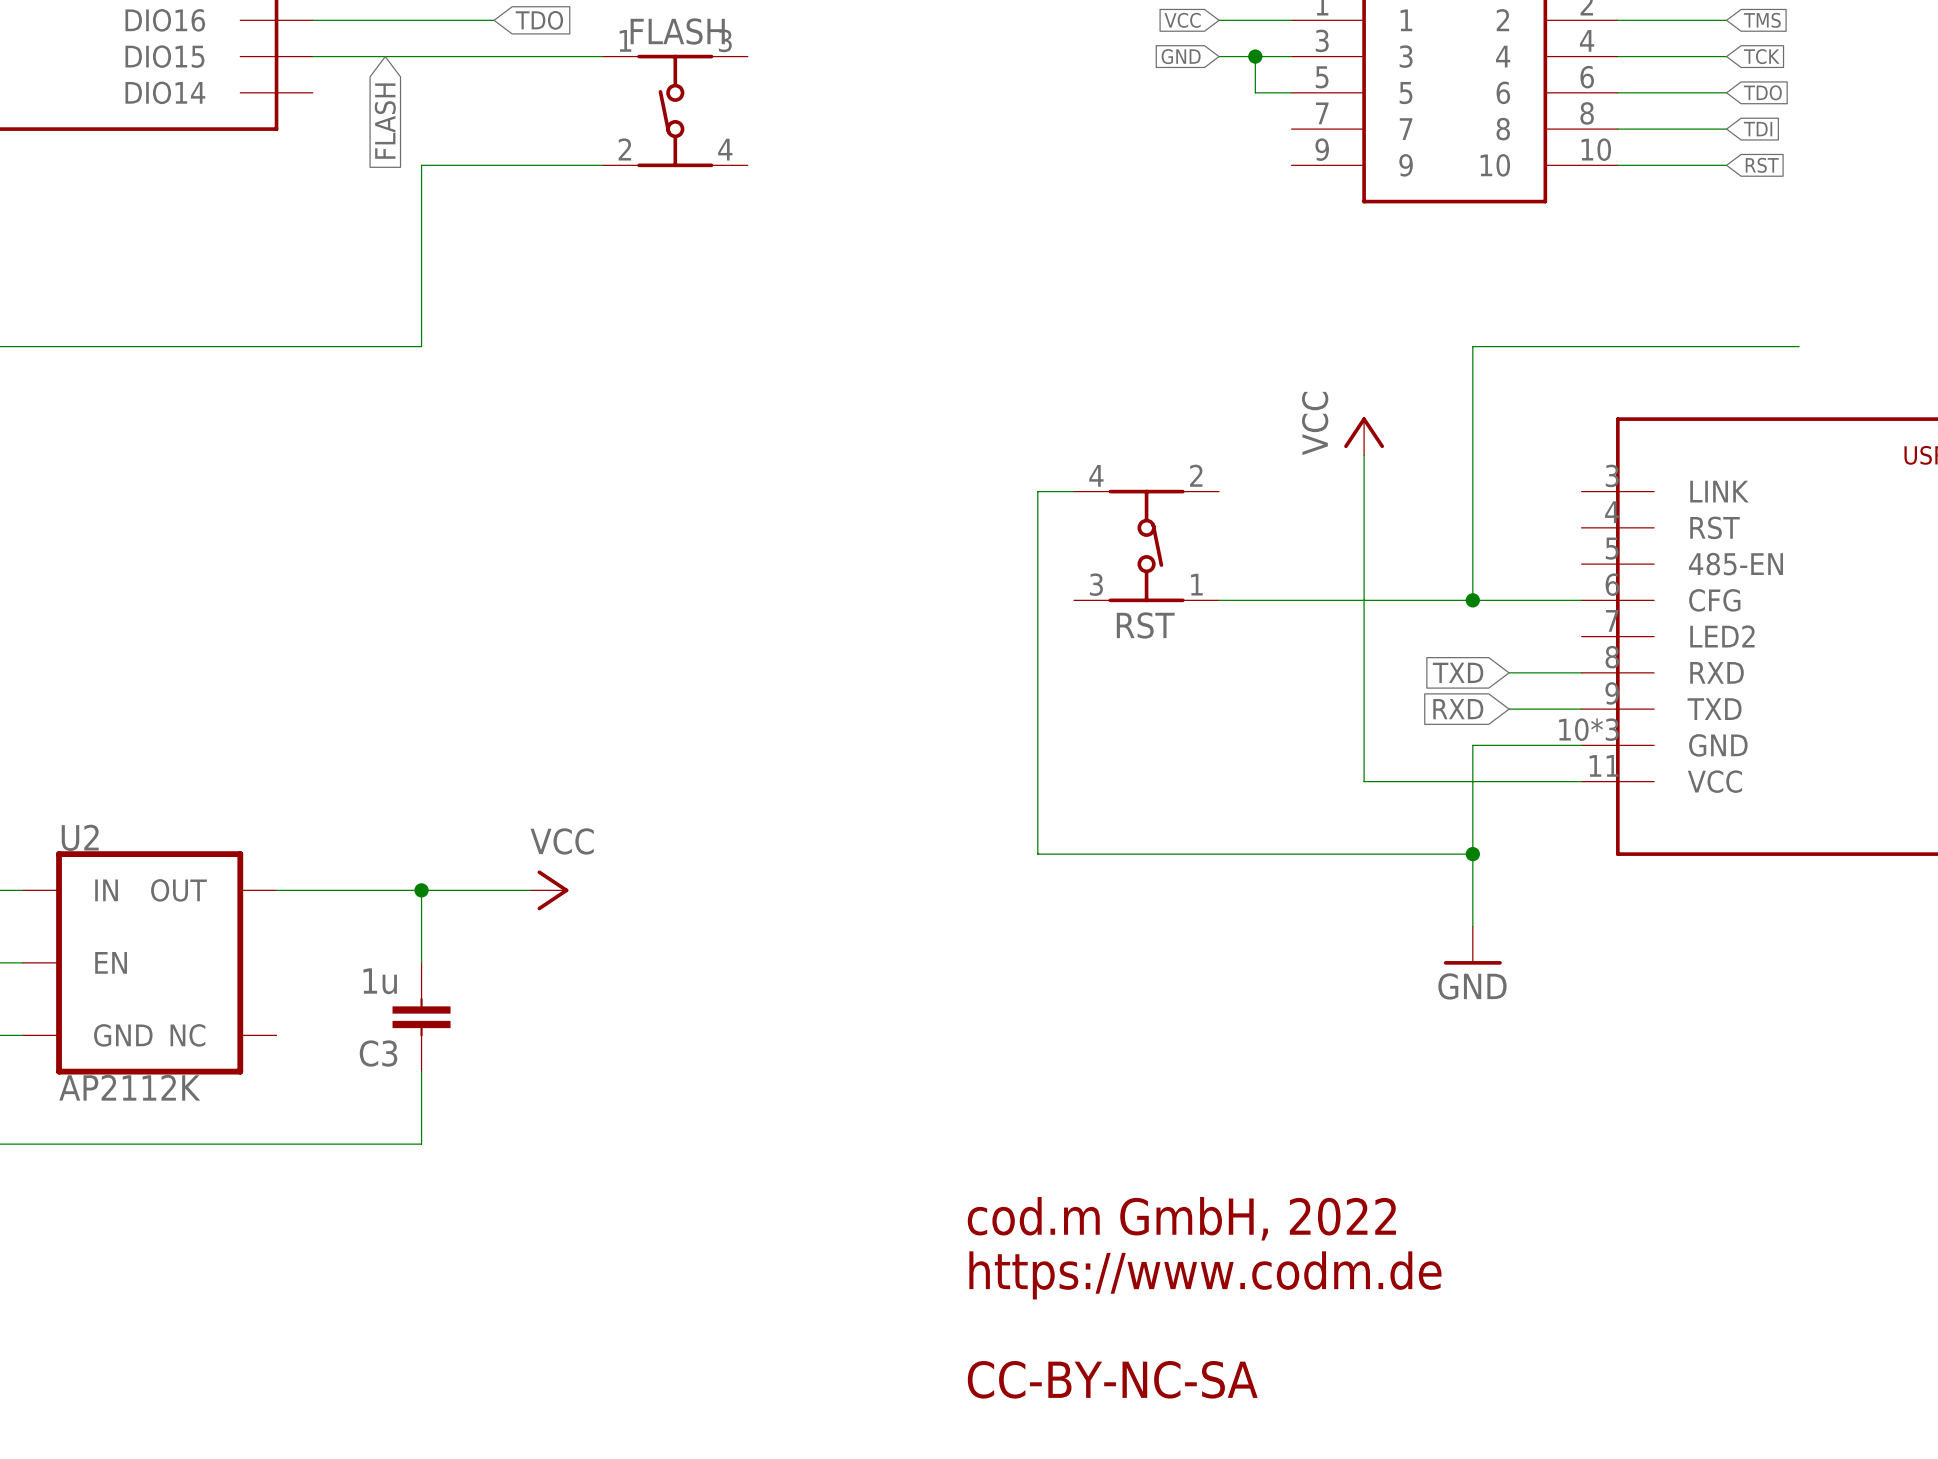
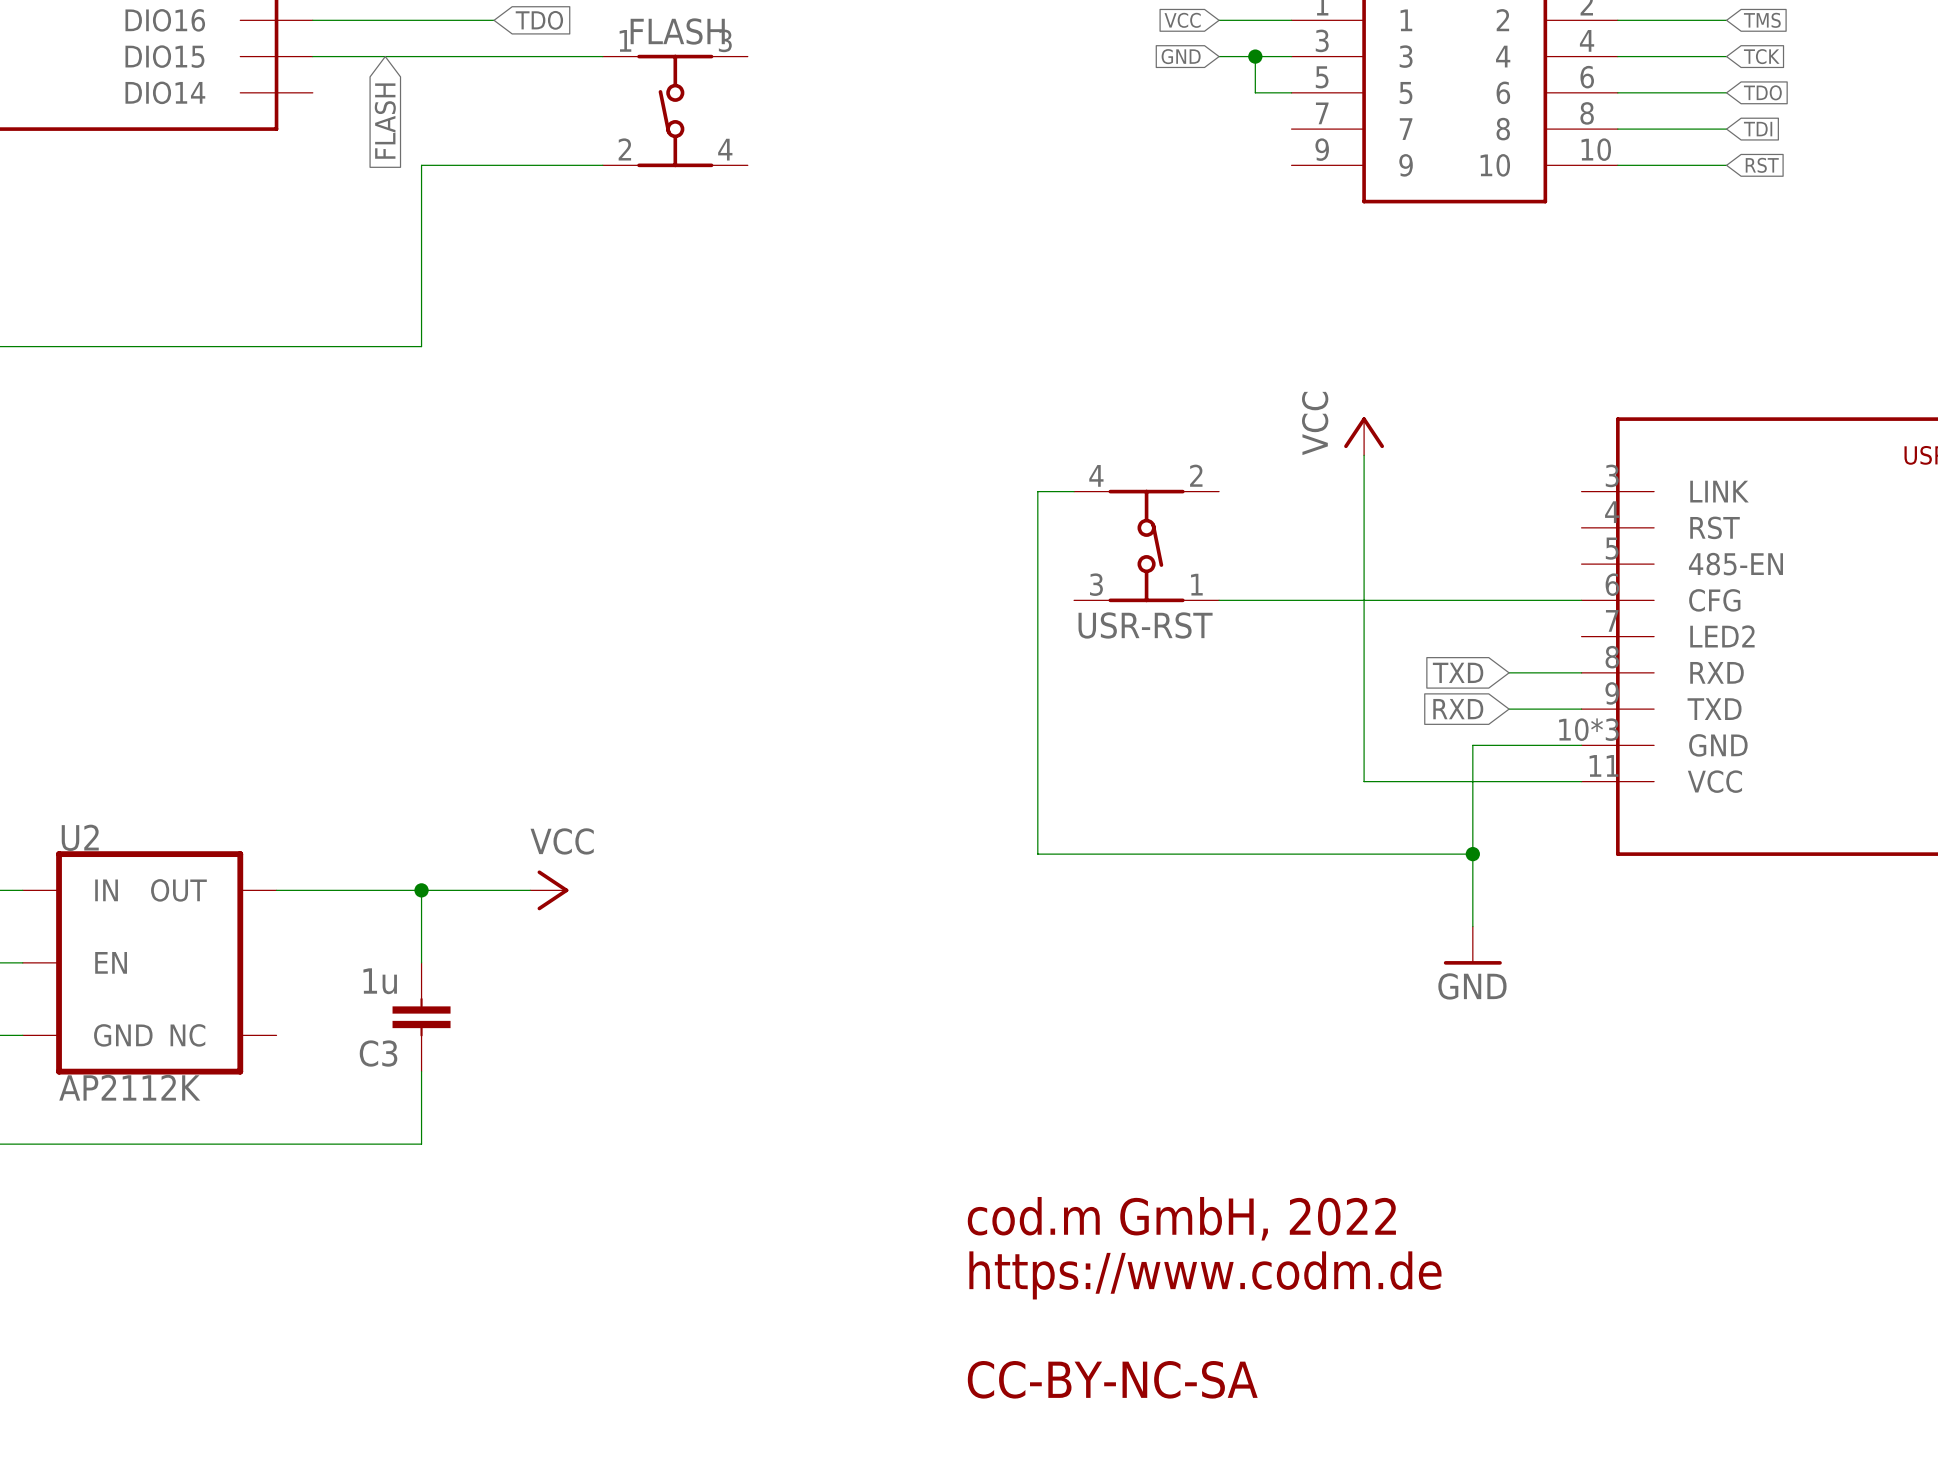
wire: (1799, 346) (1472, 346) (1472, 600) -> none
junction: (1472, 600) -> none
RST name: RST (1145, 625) -> USR-RST (1145, 625)

